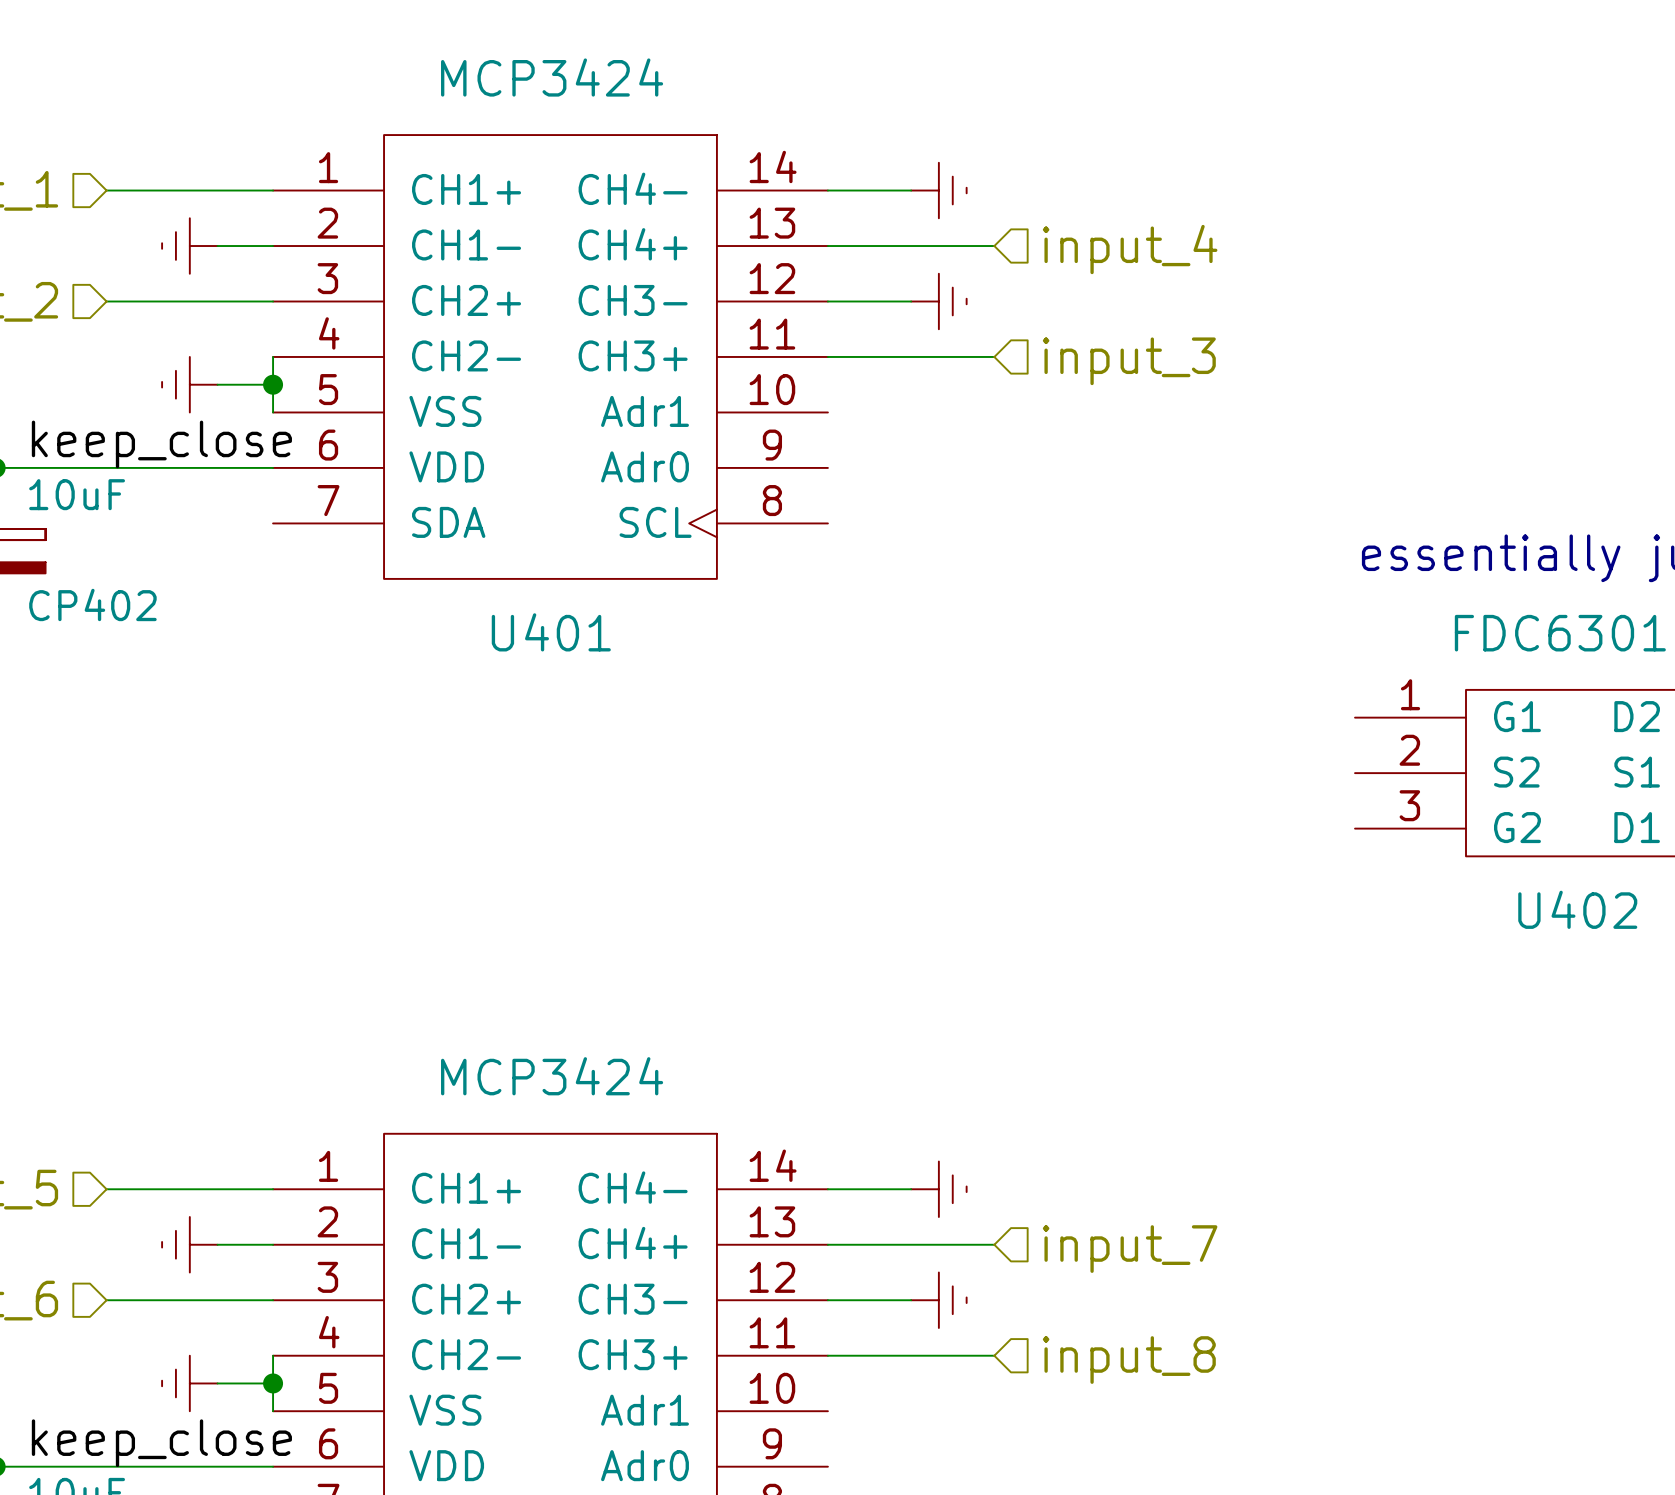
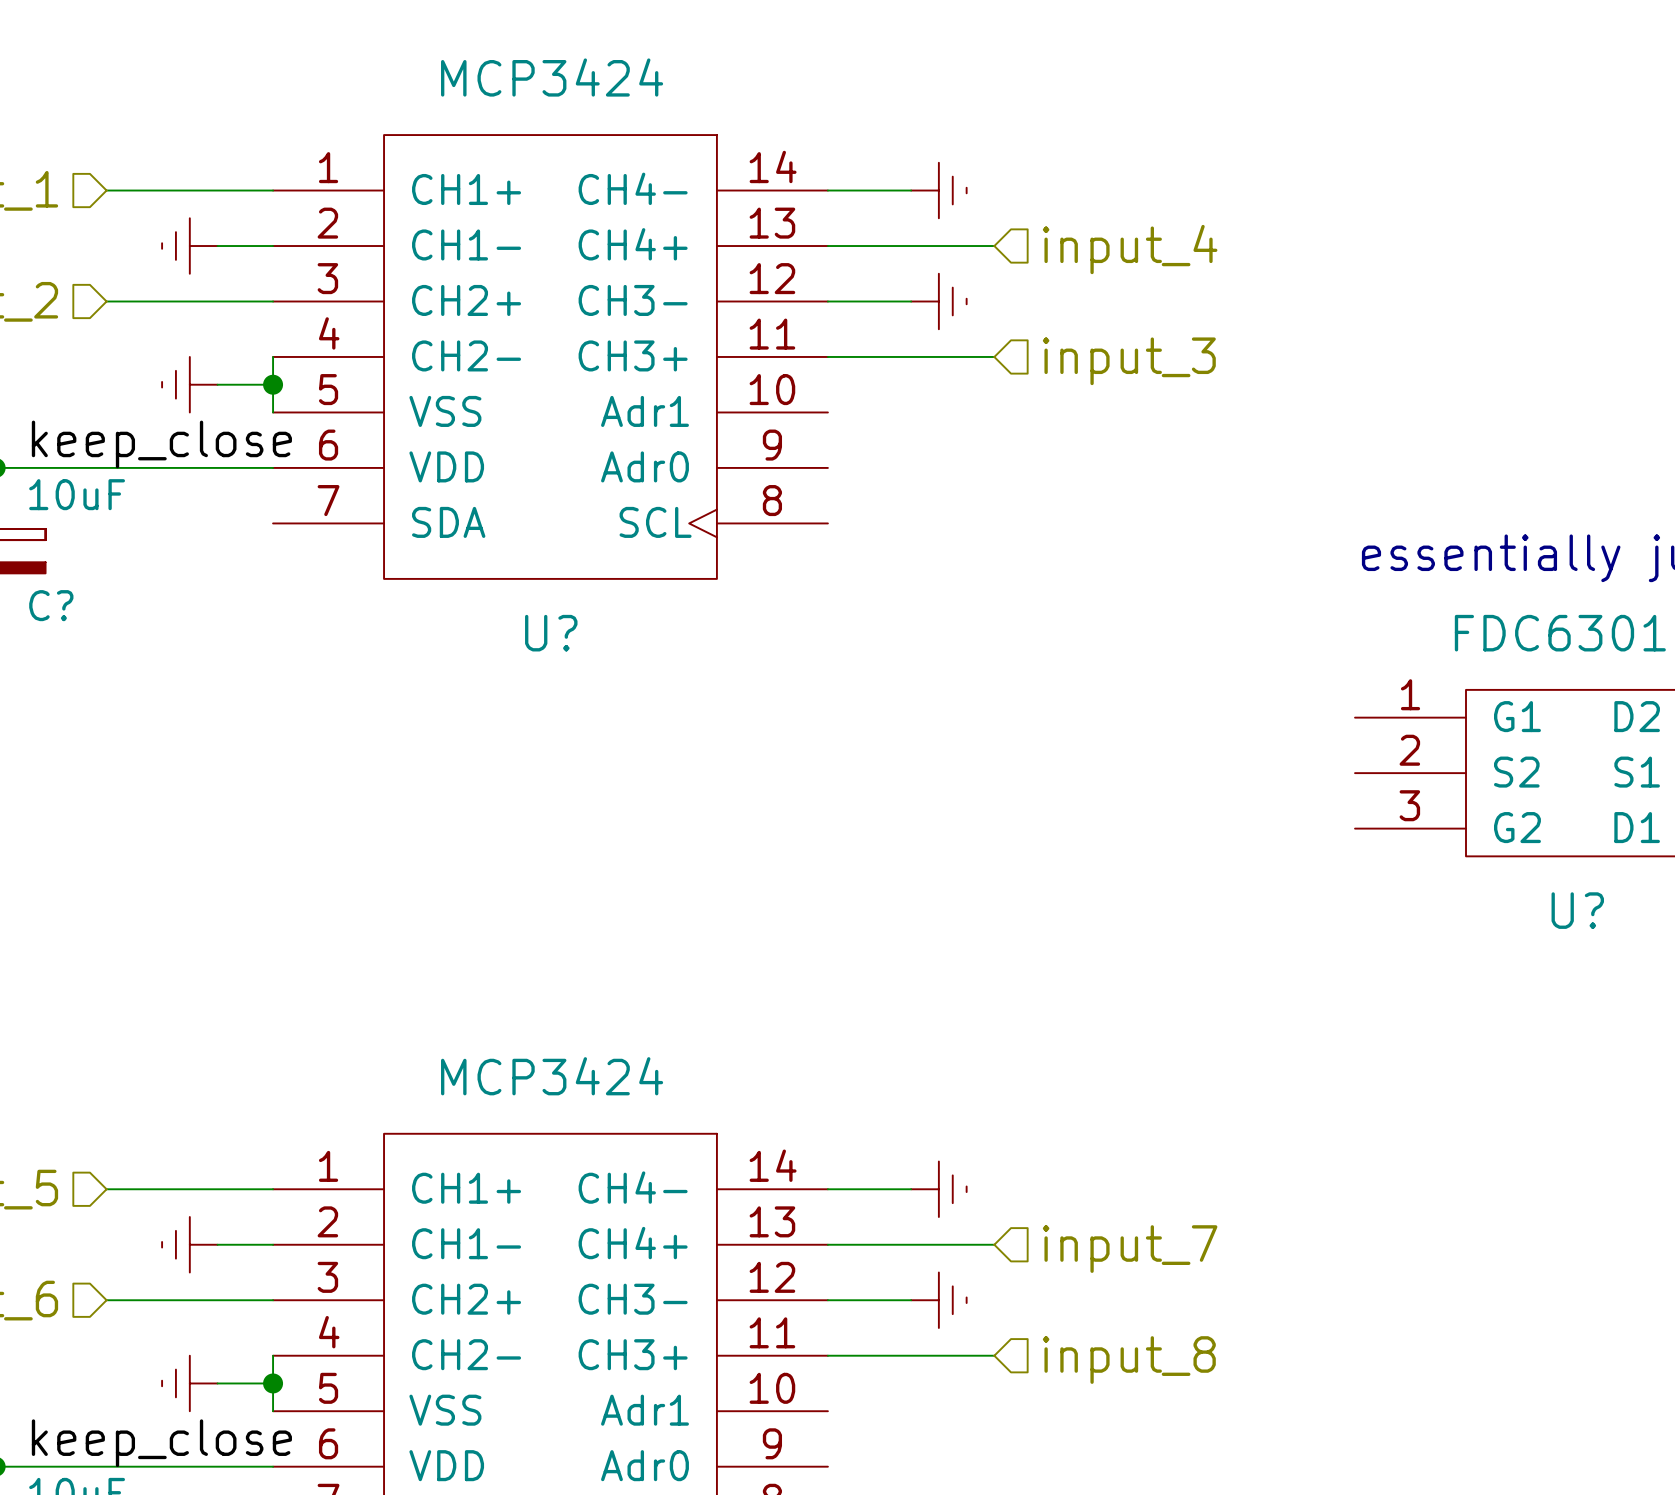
CP402 name: CP402 (92, 604) -> C? (51, 605)
U401 name: U401 (551, 632) -> U? (551, 633)
U402 name: U402 (1577, 909) -> U? (1577, 910)

